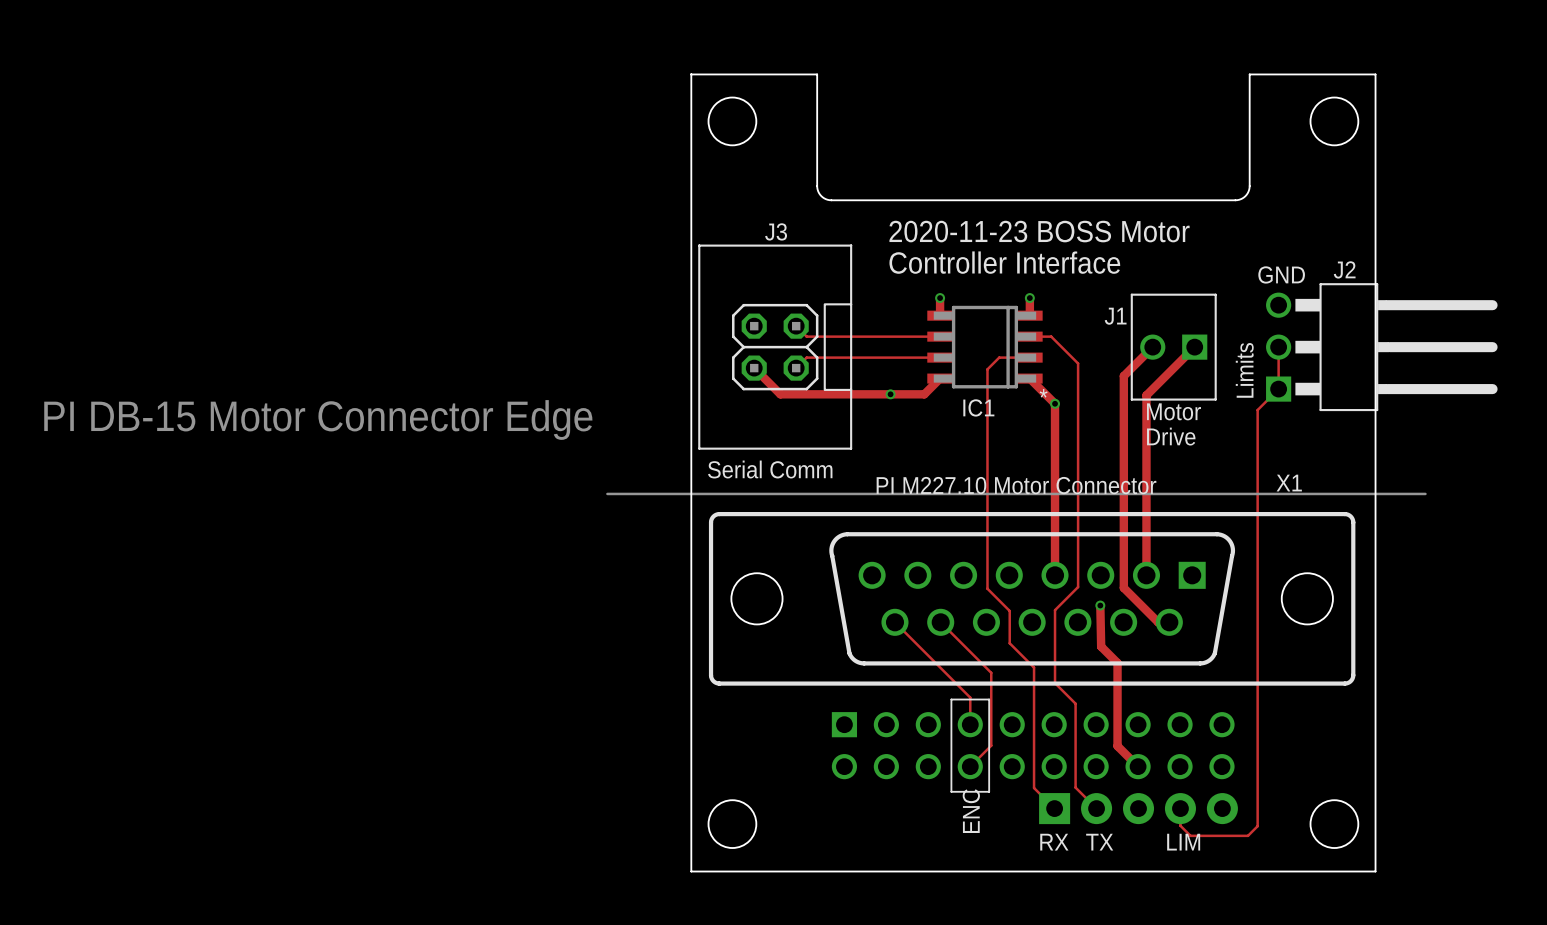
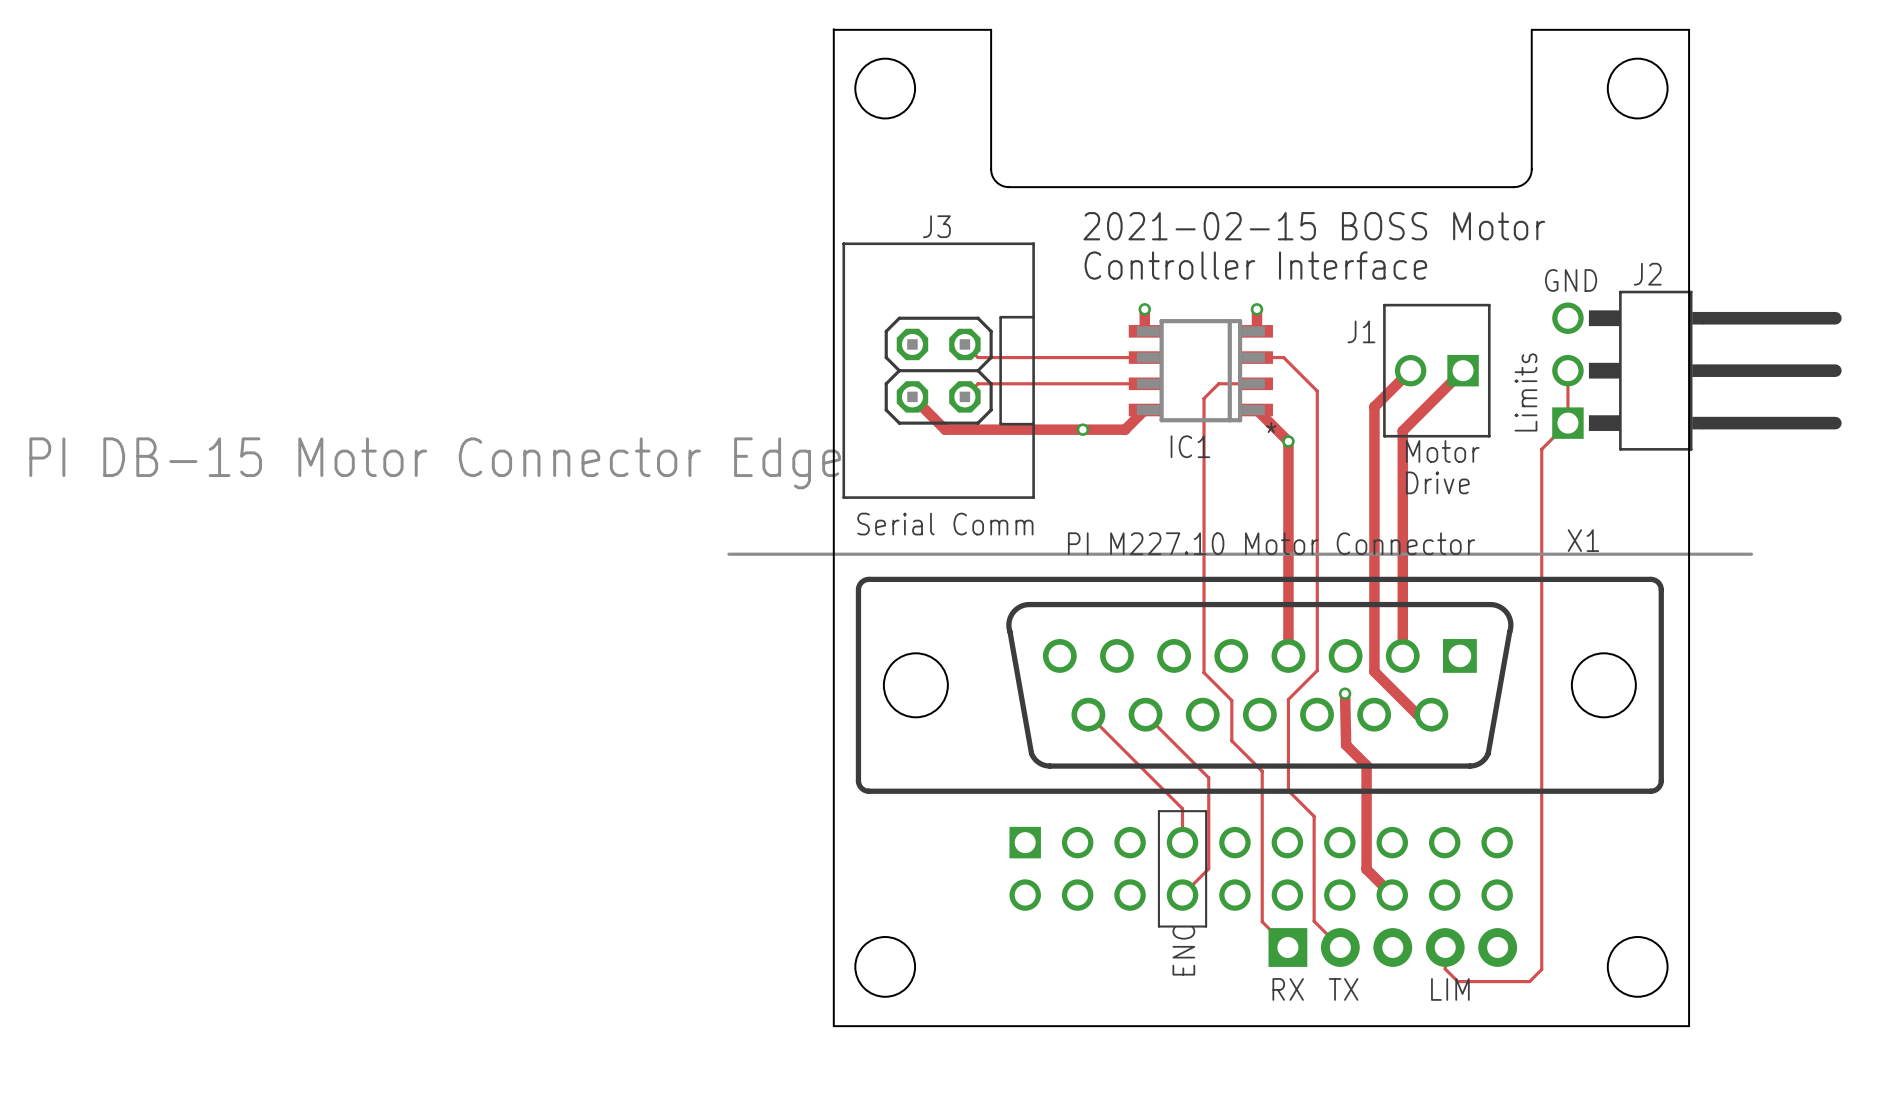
text: 2020-11-23 BOSS Motor (1039, 231) -> 2021-02-15 BOSS Motor (1314, 226)

